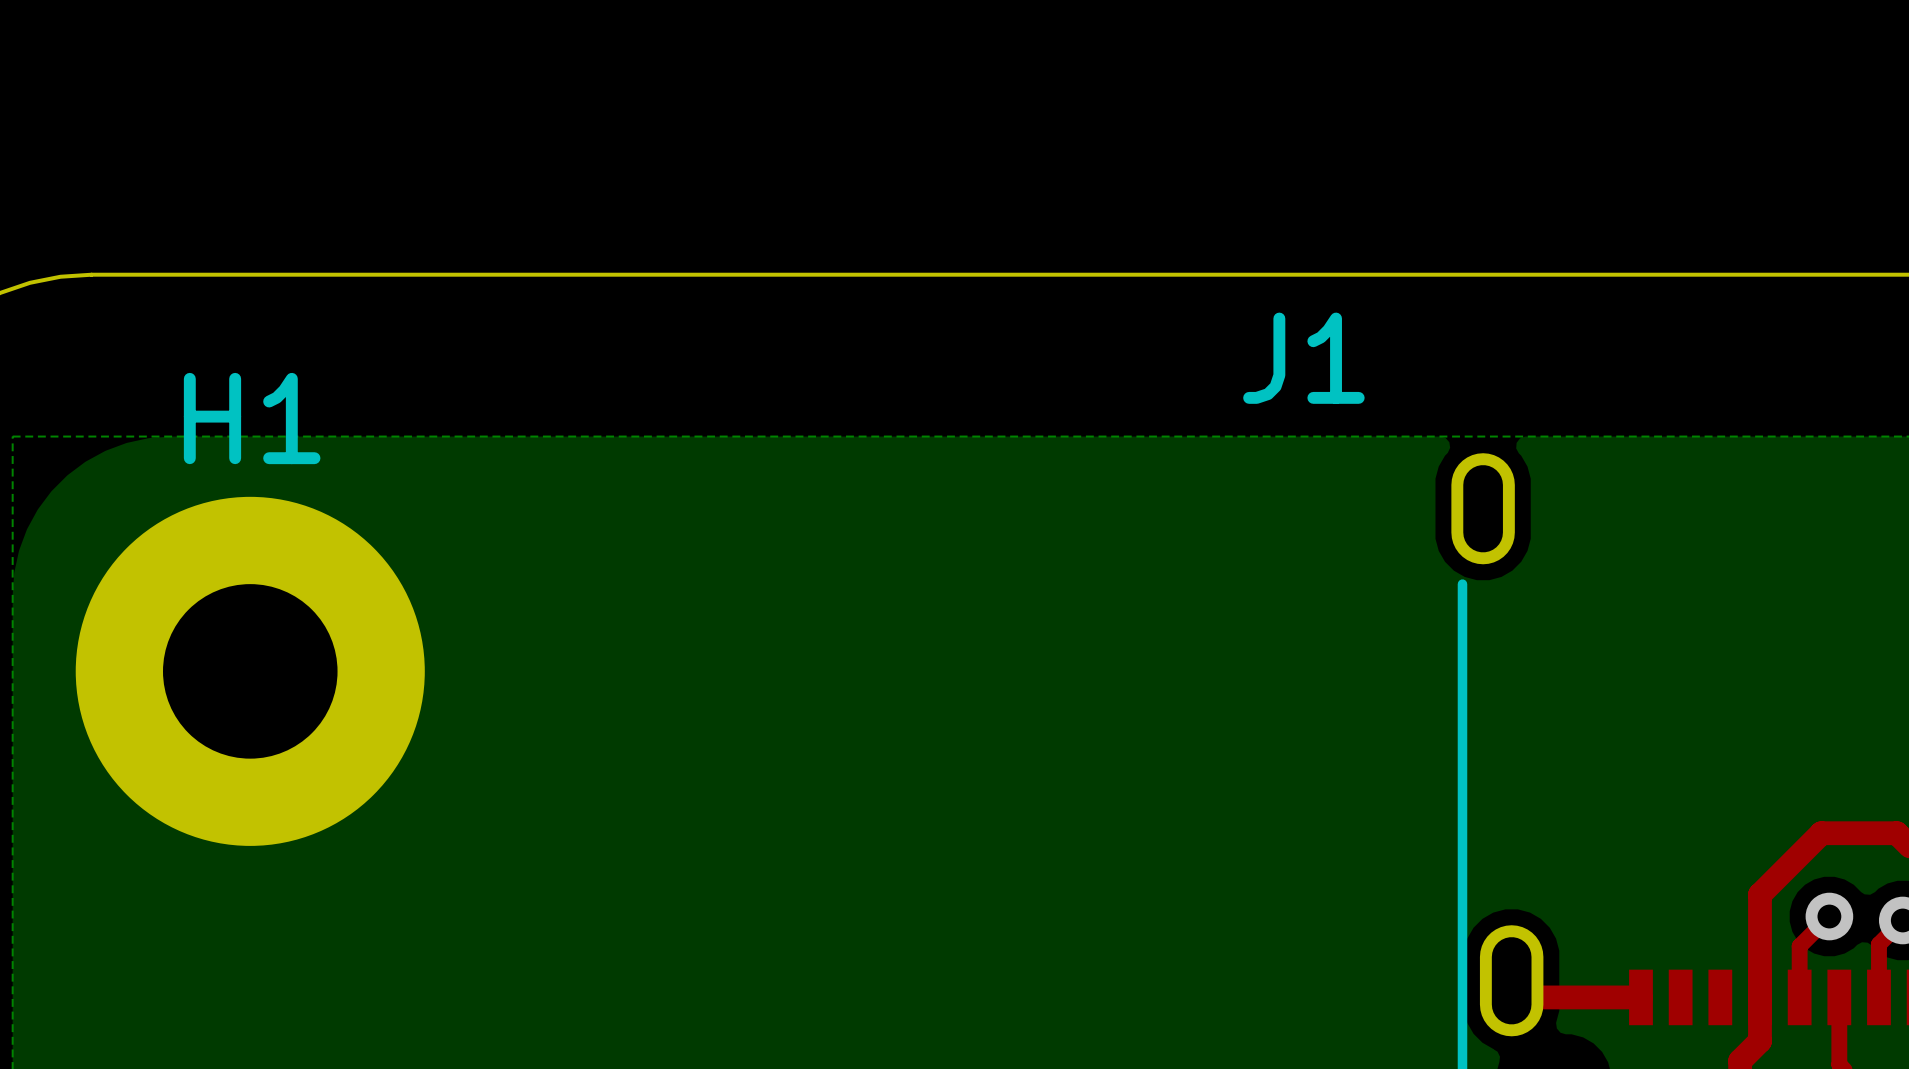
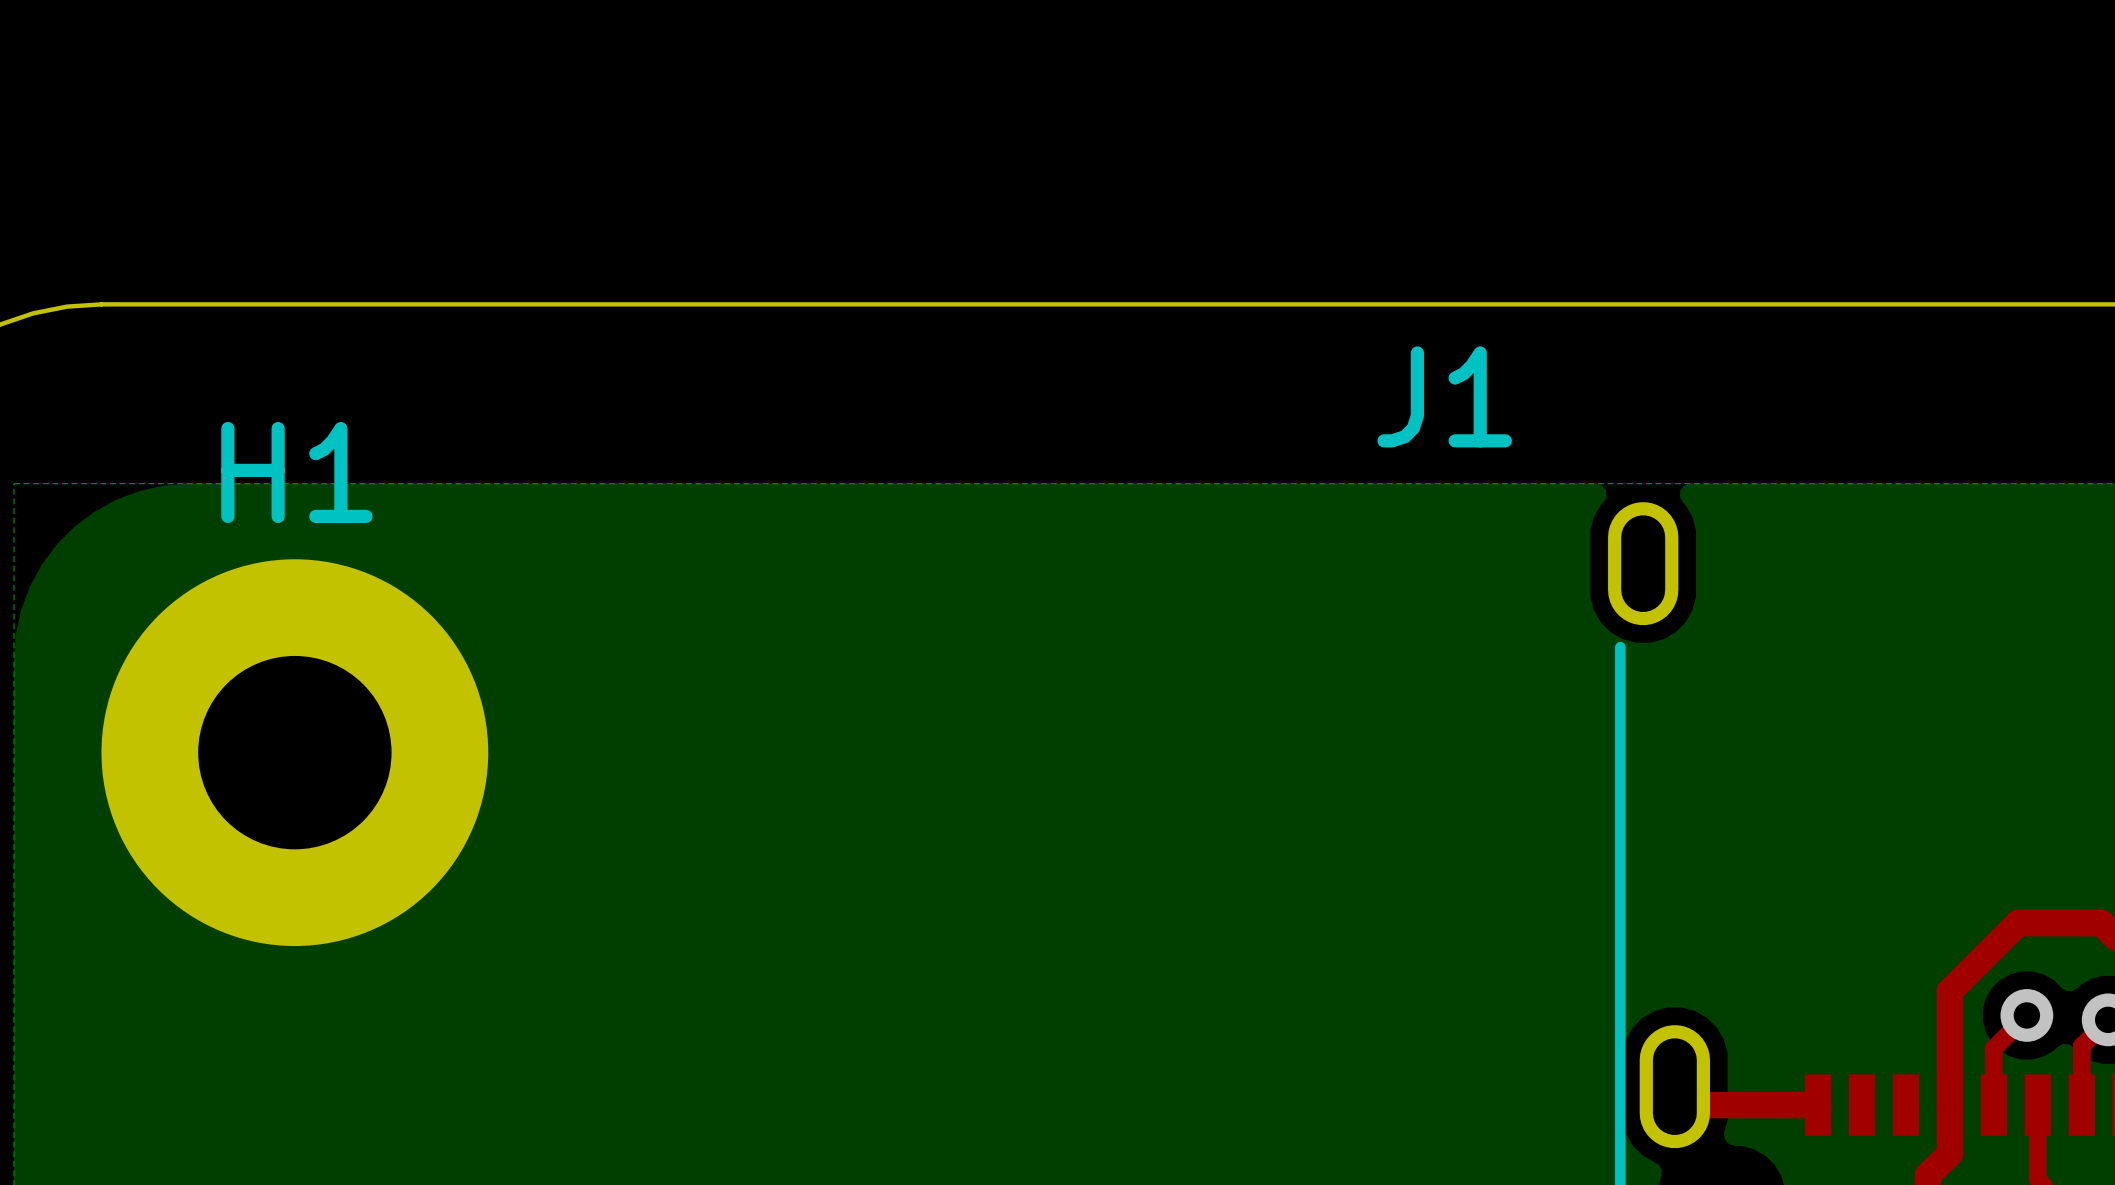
H1 position: (250, 671) -> (294, 752)

